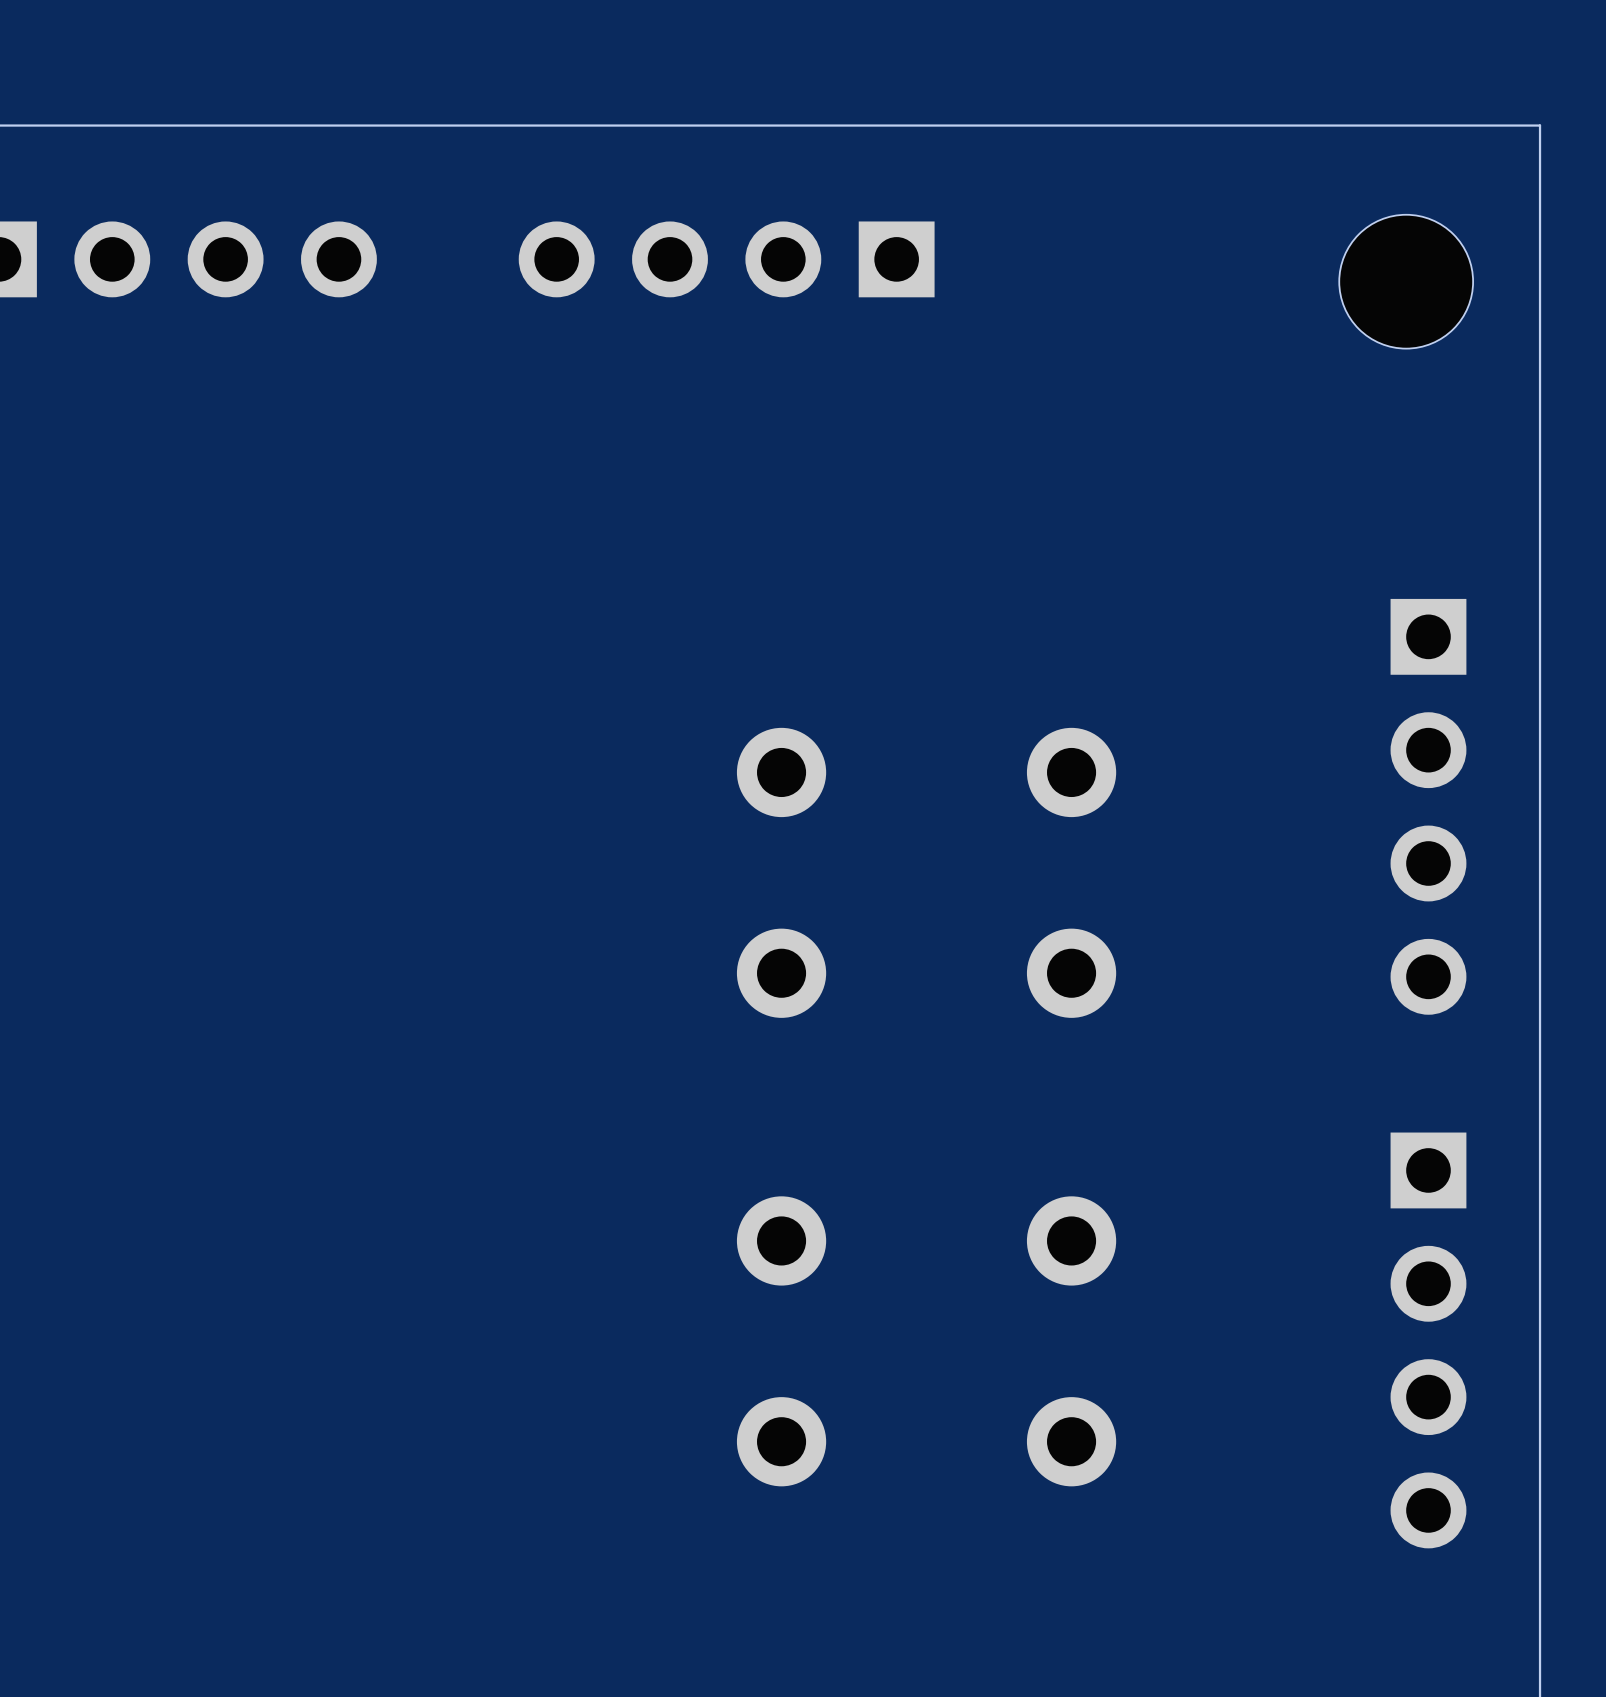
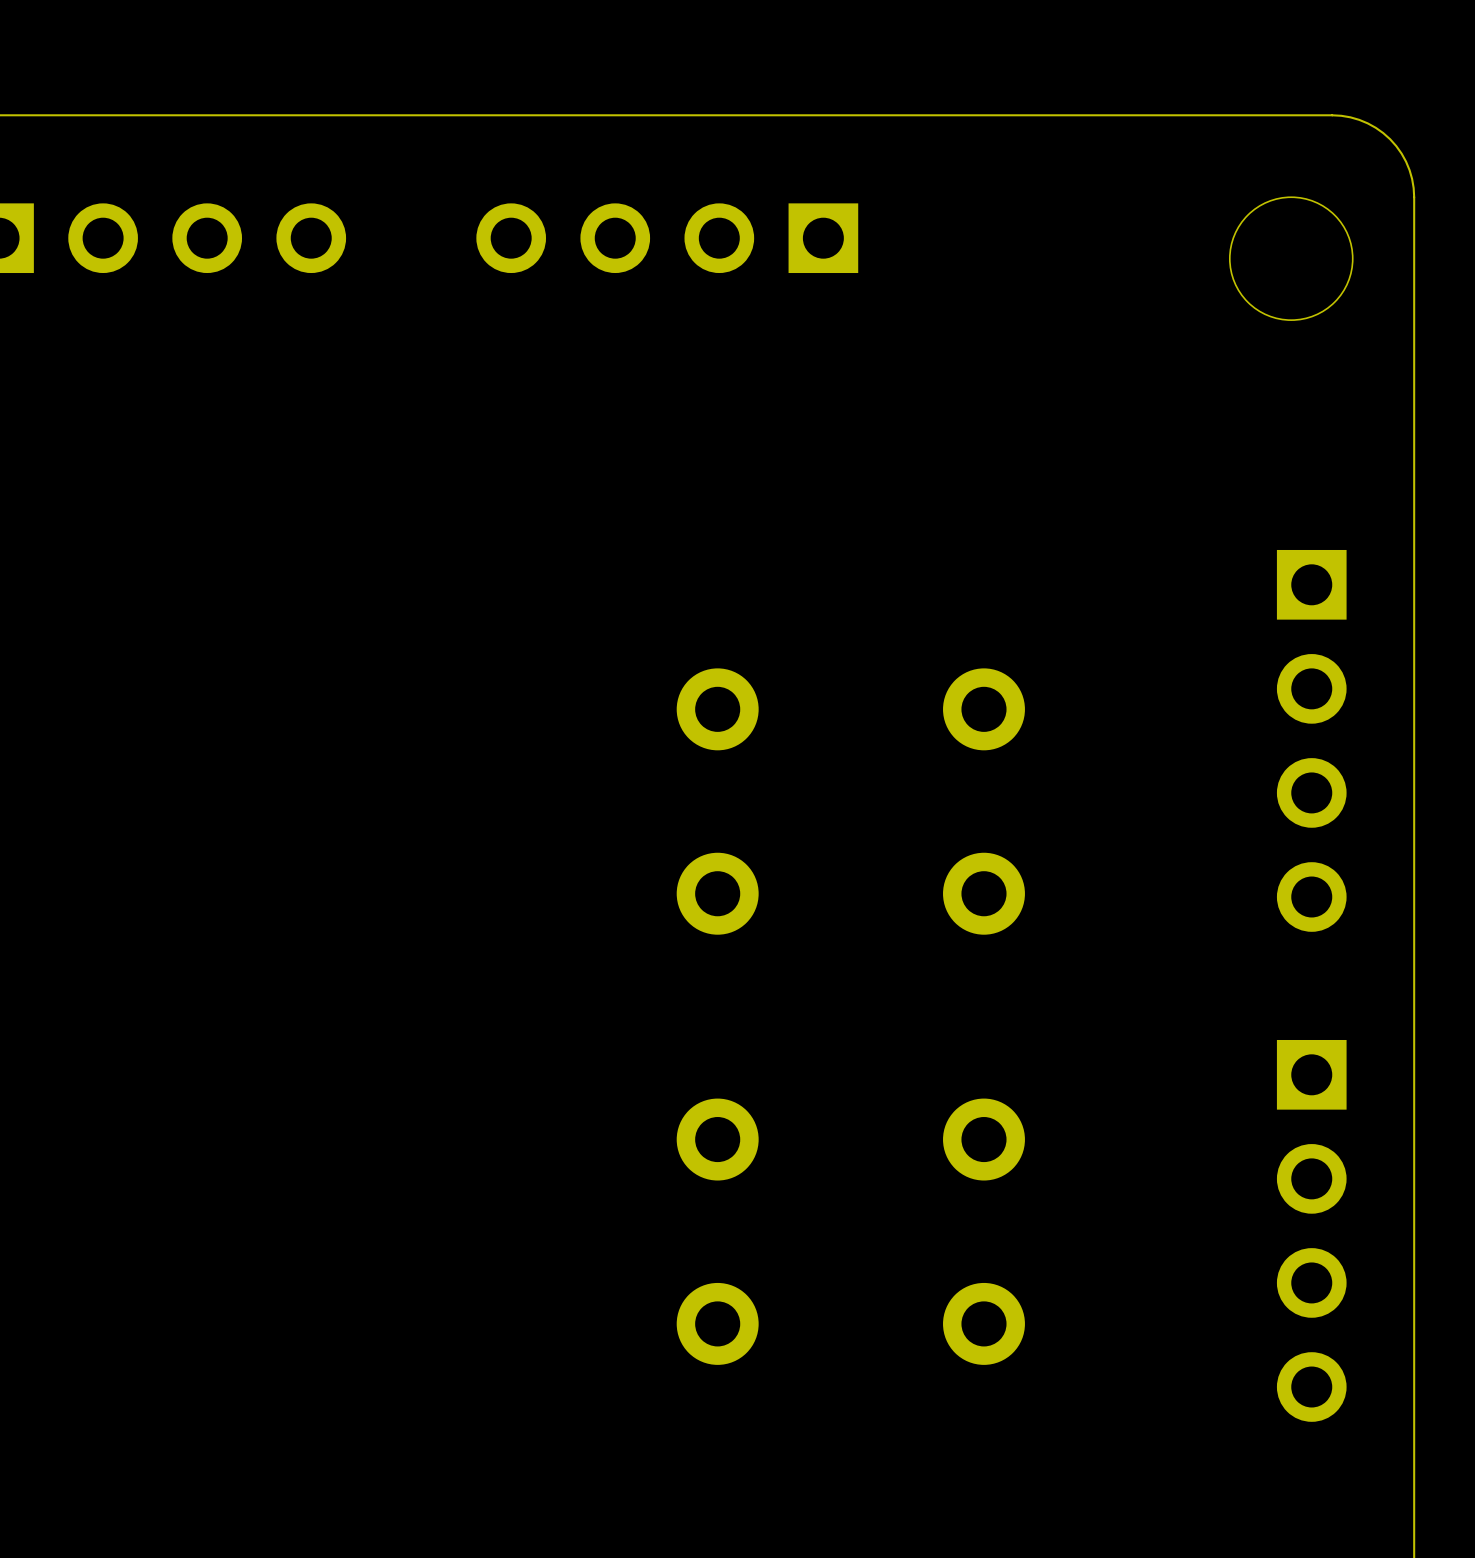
board edge: (1450, 125) (1540, 125) (1540, 214) -> (1332, 115) (1359, 119) (1375, 127) (1390, 139) (1401, 153) (1409, 170) (1414, 197)

